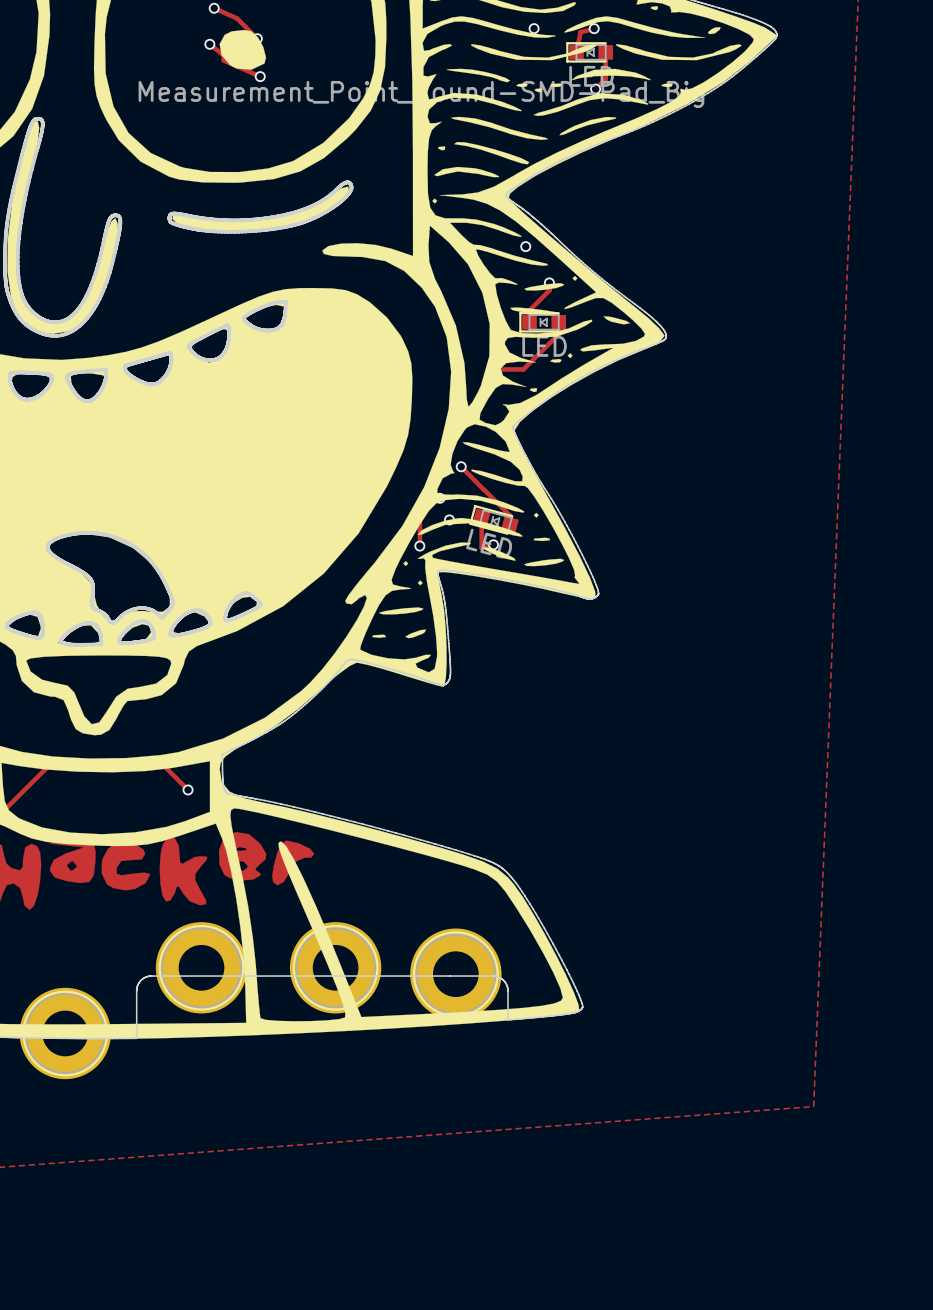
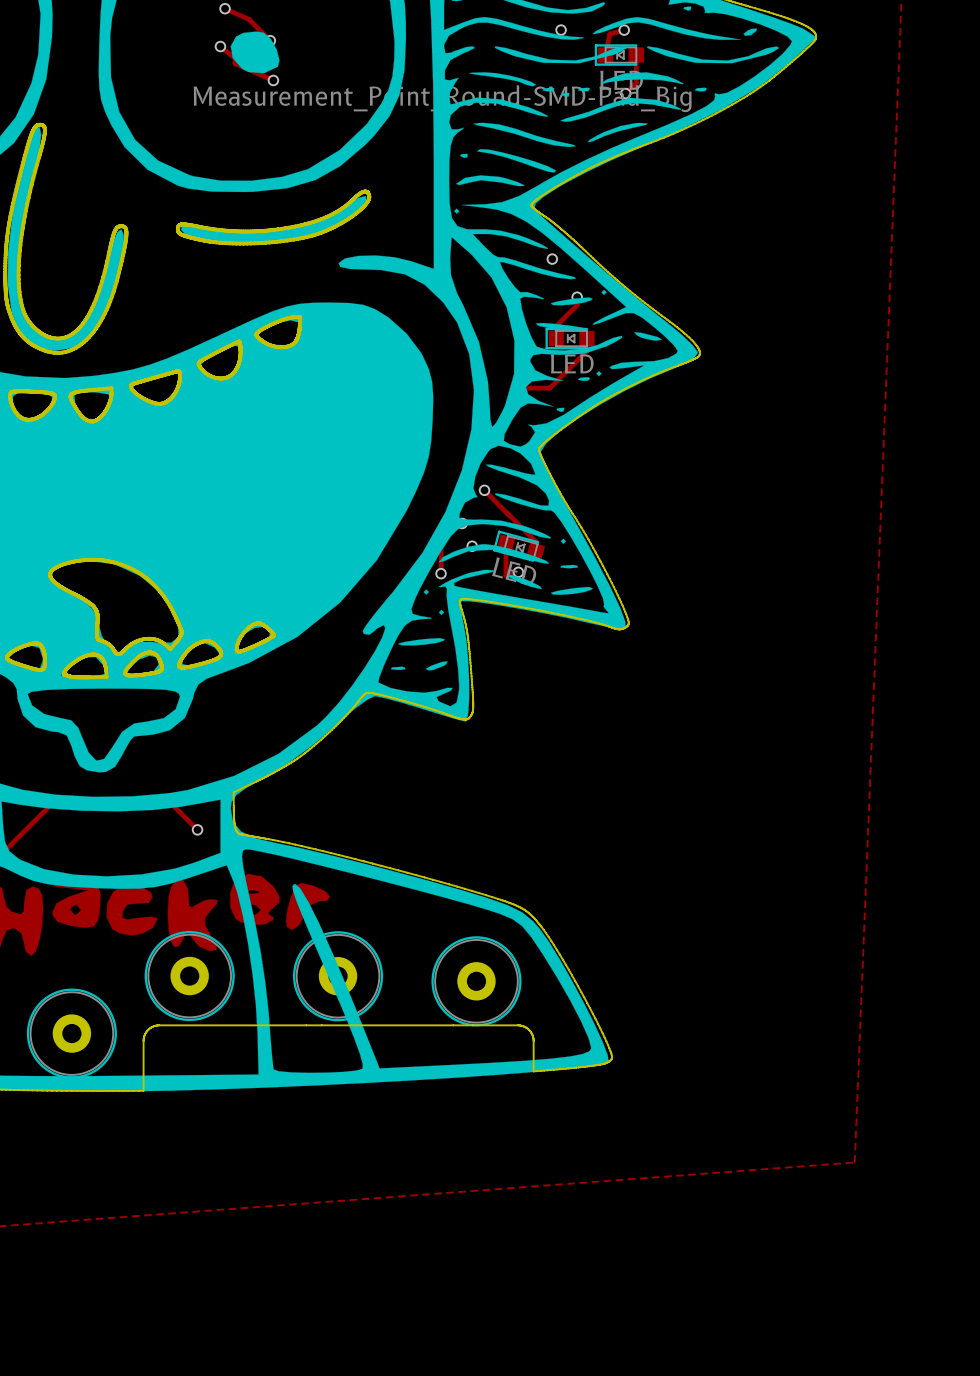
part: none -> (189, 976)
part: none -> (338, 976)
part: none -> (476, 981)
part: (201, 967) -> none
part: (335, 967) -> none
part: (455, 974) -> none
part: none -> (71, 1033)
part: (65, 1033) -> none

